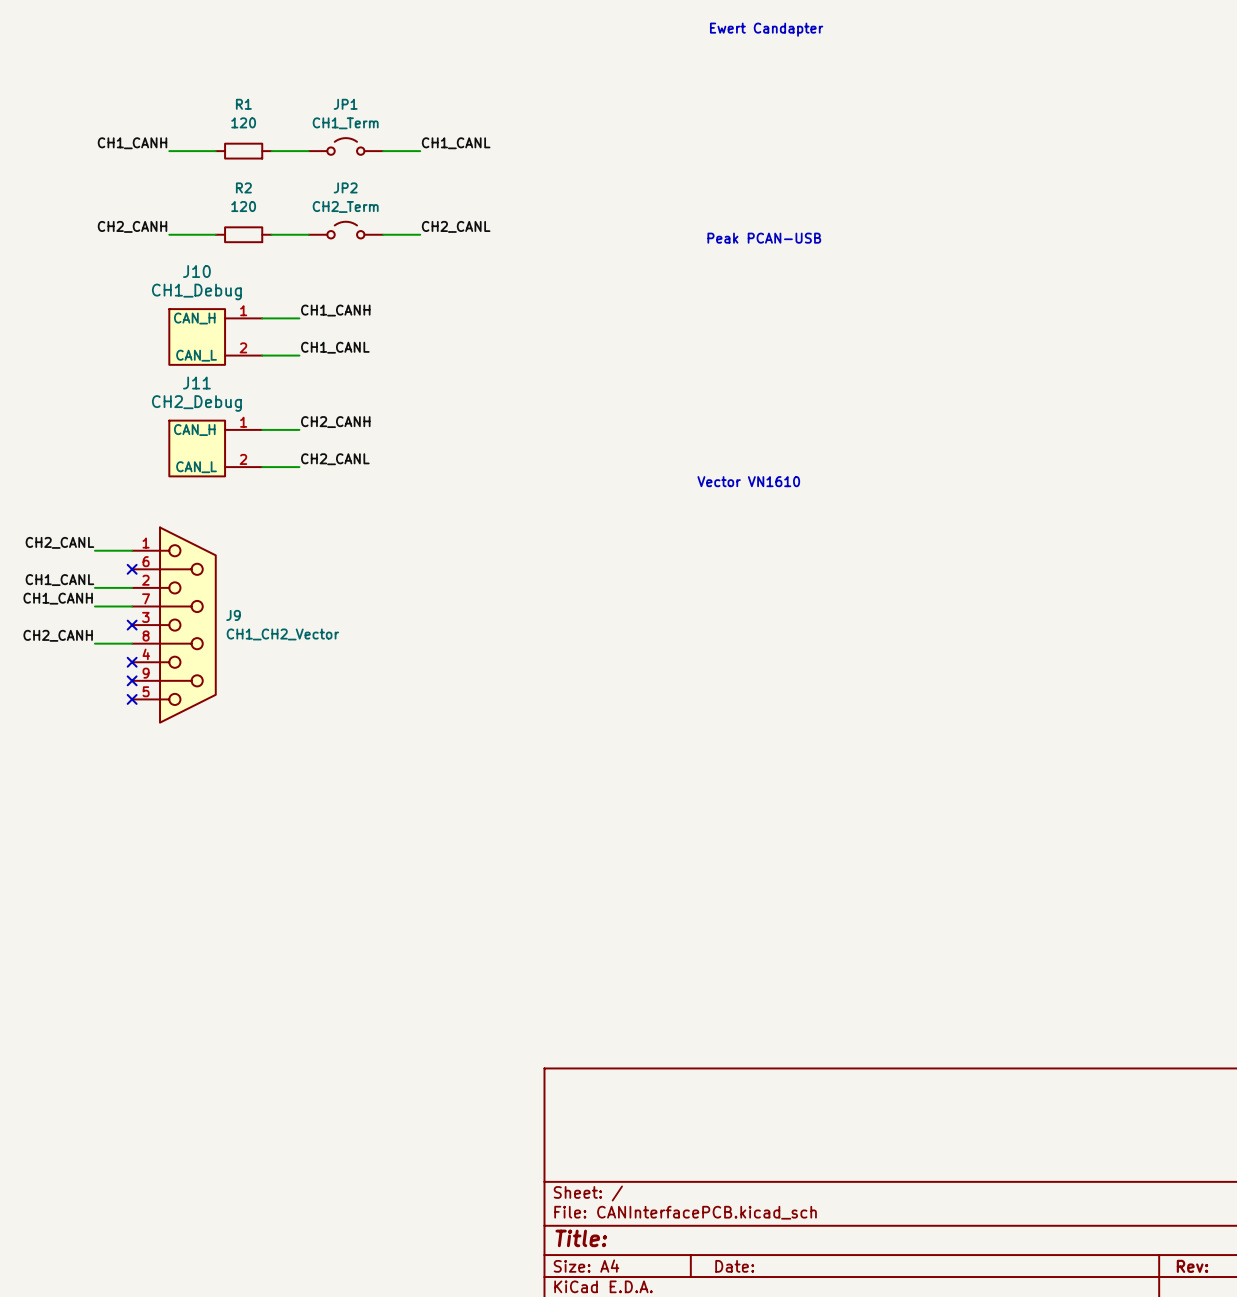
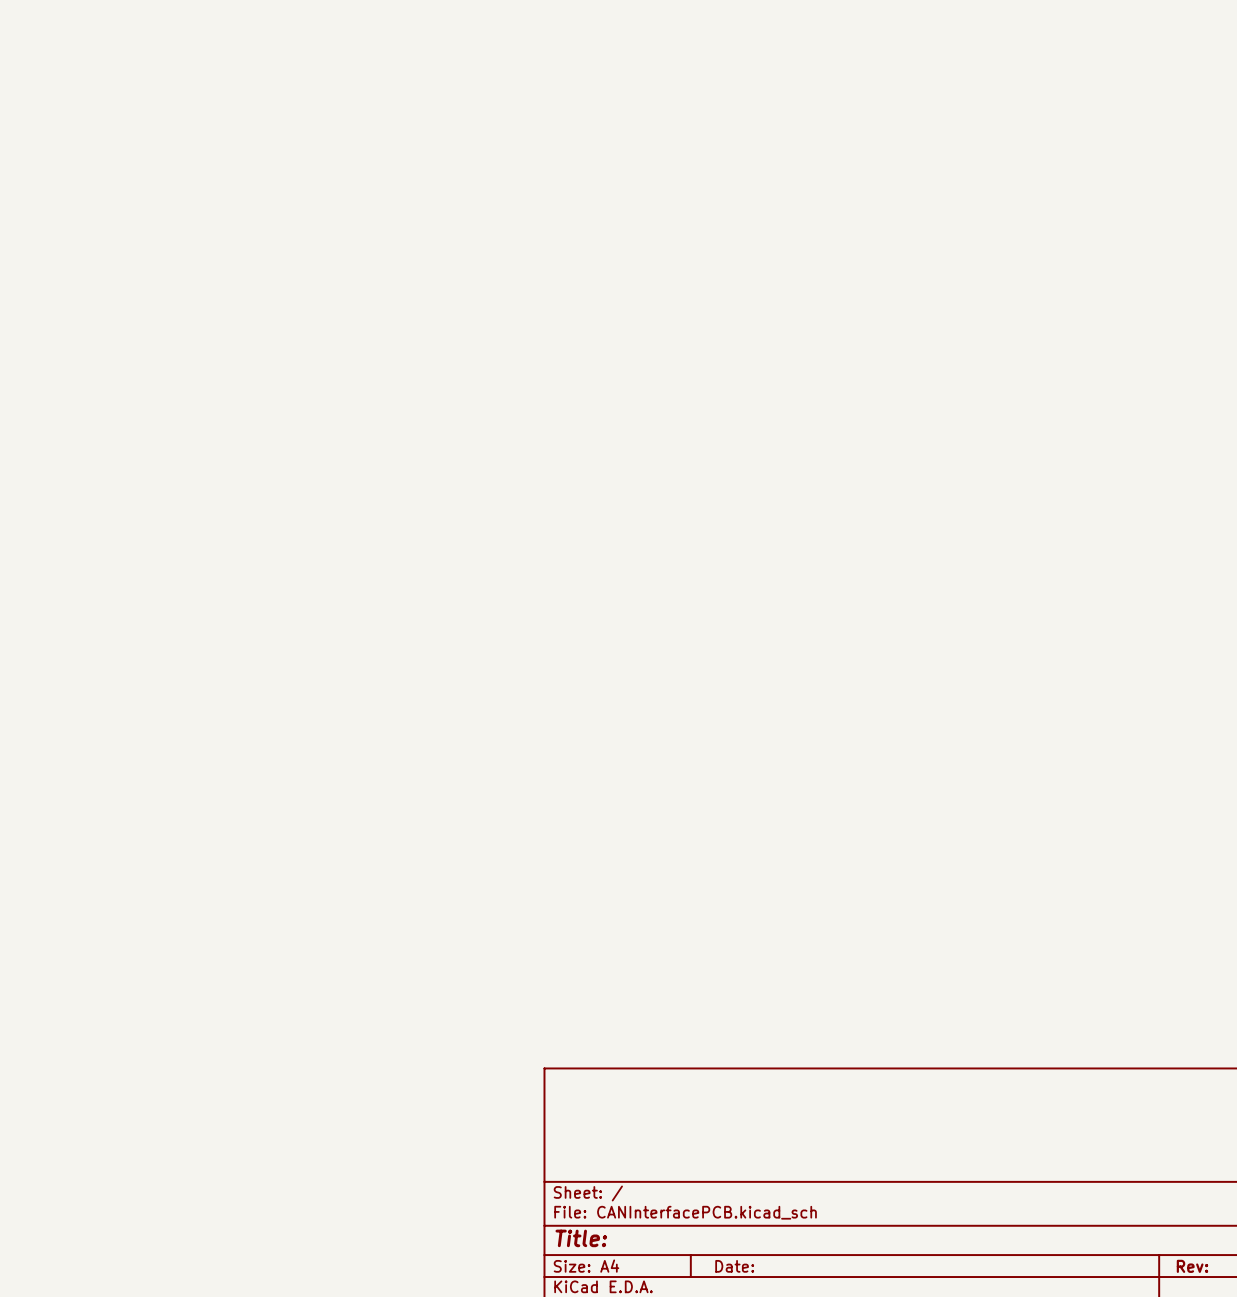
text: Ewert Candapter (766, 29) -> none
label: CH1_CANH (132, 143) -> none
label: CH1_CANL (456, 143) -> none
JP1: CH1_Term (345, 146) -> none
wire: (169, 151) (215, 151) -> none
R1: 120 (243, 151) -> none
wire: (271, 151) (308, 151) -> none
wire: (383, 151) (420, 151) -> none
label: CH2_CANH (132, 226) -> none
label: CH2_CANL (456, 226) -> none
JP2: CH2_Term (345, 230) -> none
wire: (169, 234) (215, 234) -> none
R2: 120 (243, 234) -> none
wire: (271, 234) (308, 234) -> none
wire: (383, 234) (420, 234) -> none
text: Peak PCAN-USB (764, 238) -> none
label: CH1_CANH (335, 310) -> none
wire: (262, 318) (299, 318) -> none
J10: CH1_Debug (215, 336) -> none
label: CH1_CANL (335, 347) -> none
wire: (262, 355) (299, 355) -> none
label: CH2_CANH (335, 422) -> none
wire: (262, 429) (299, 429) -> none
J11: CH2_Debug (215, 448) -> none
label: CH2_CANL (335, 459) -> none
wire: (262, 467) (299, 467) -> none
text: Vector VN1610 (748, 481) -> none
label: CH2_CANL (59, 542) -> none
wire: (94, 550) (132, 550) -> none
no-connect mark: (132, 569) -> none
label: CH1_CANL (59, 580) -> none
wire: (94, 587) (132, 587) -> none
label: CH1_CANH (58, 598) -> none
wire: (94, 606) (132, 606) -> none
no-connect mark: (132, 625) -> none
J9: CH1_CH2_Vector (174, 625) -> none
label: CH2_CANH (58, 635) -> none
wire: (94, 643) (132, 643) -> none
no-connect mark: (132, 662) -> none
no-connect mark: (132, 680) -> none
no-connect mark: (132, 699) -> none

